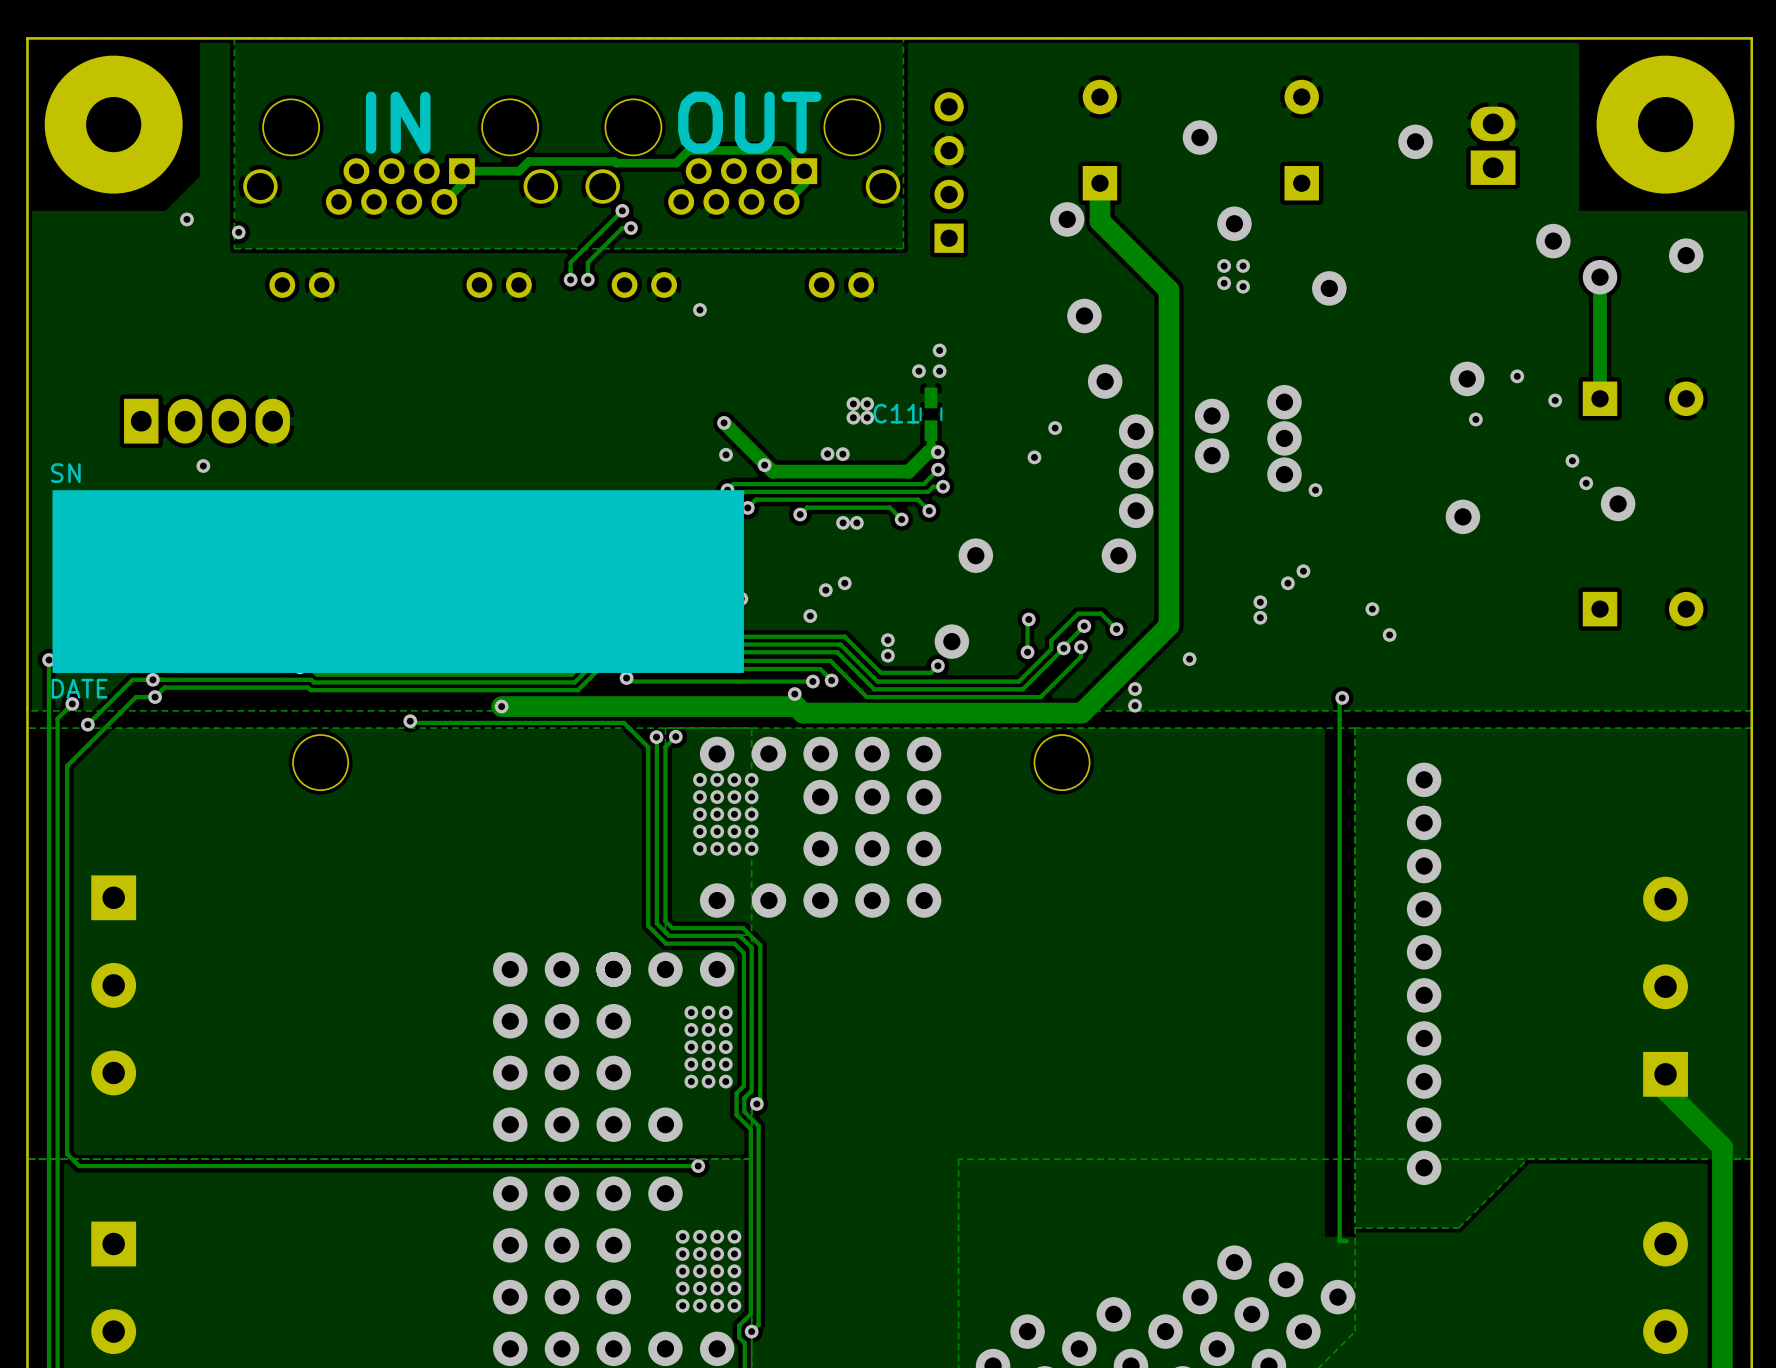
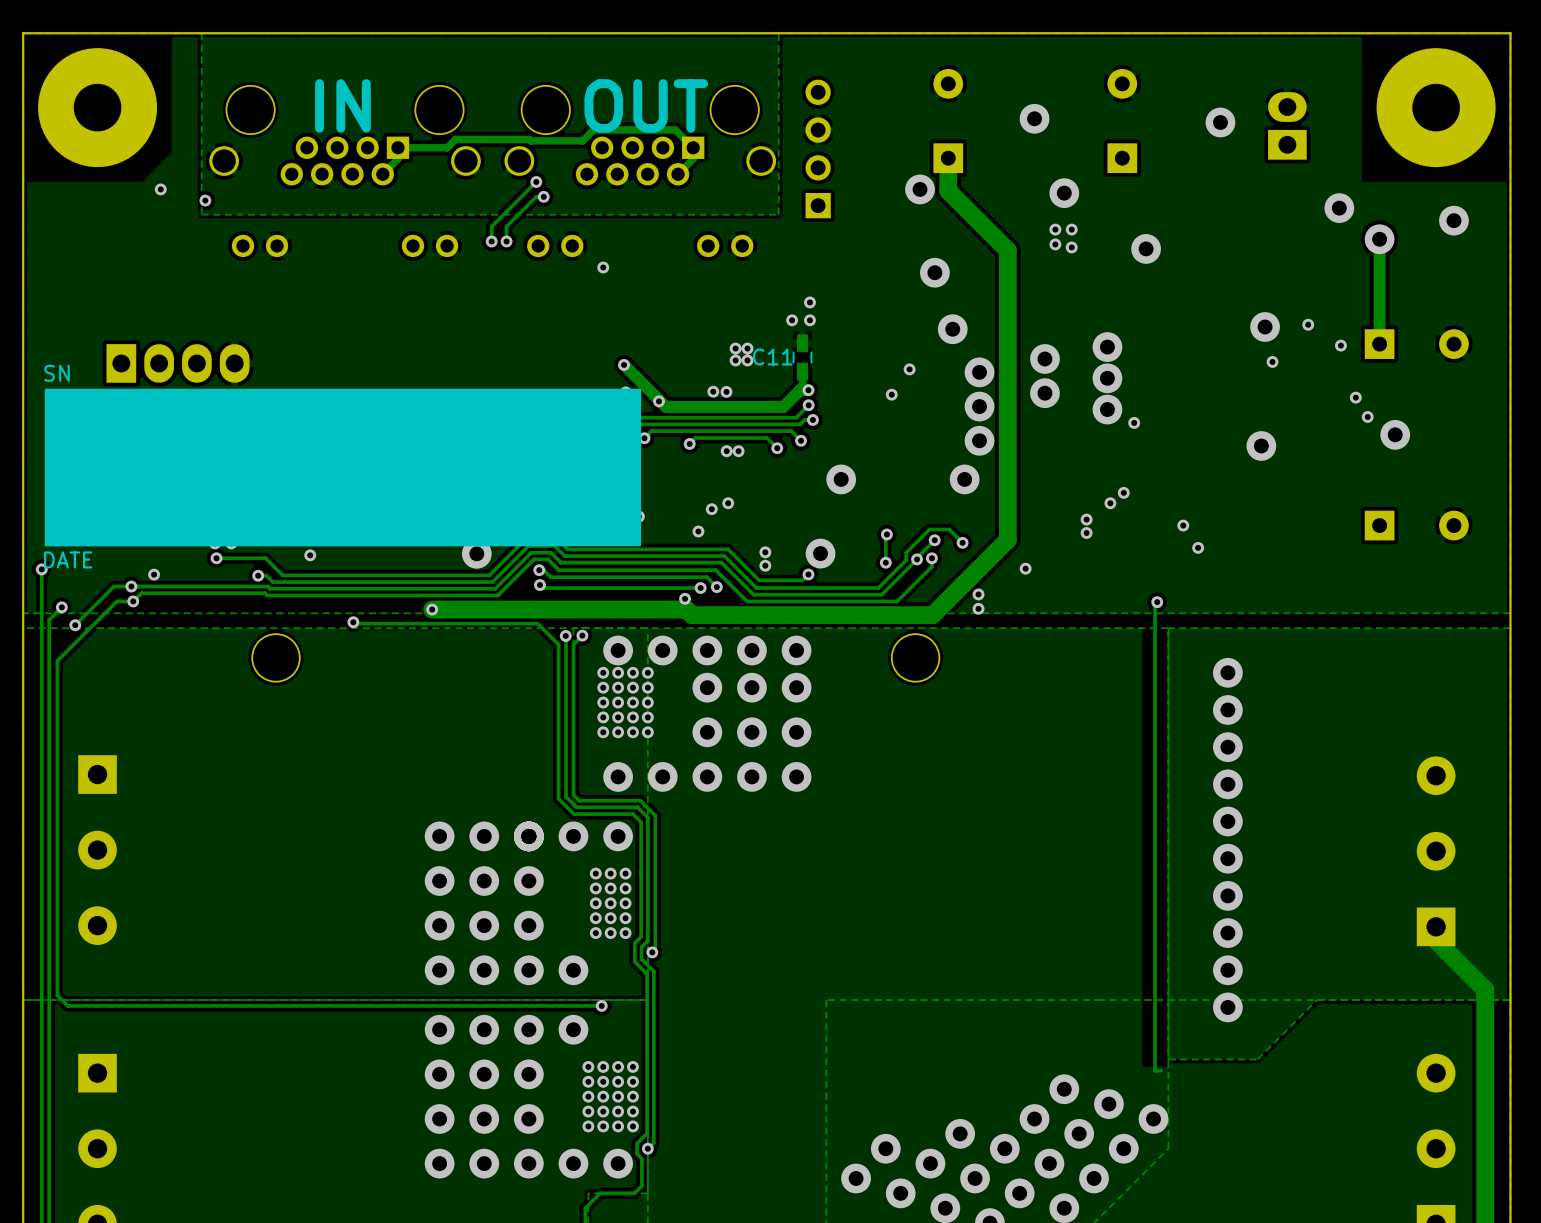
text position: SN (65, 473) -> SN (57, 373)
drawing position: (398, 581) -> (342, 467)
text position: DATE (79, 688) -> DATE (68, 559)

